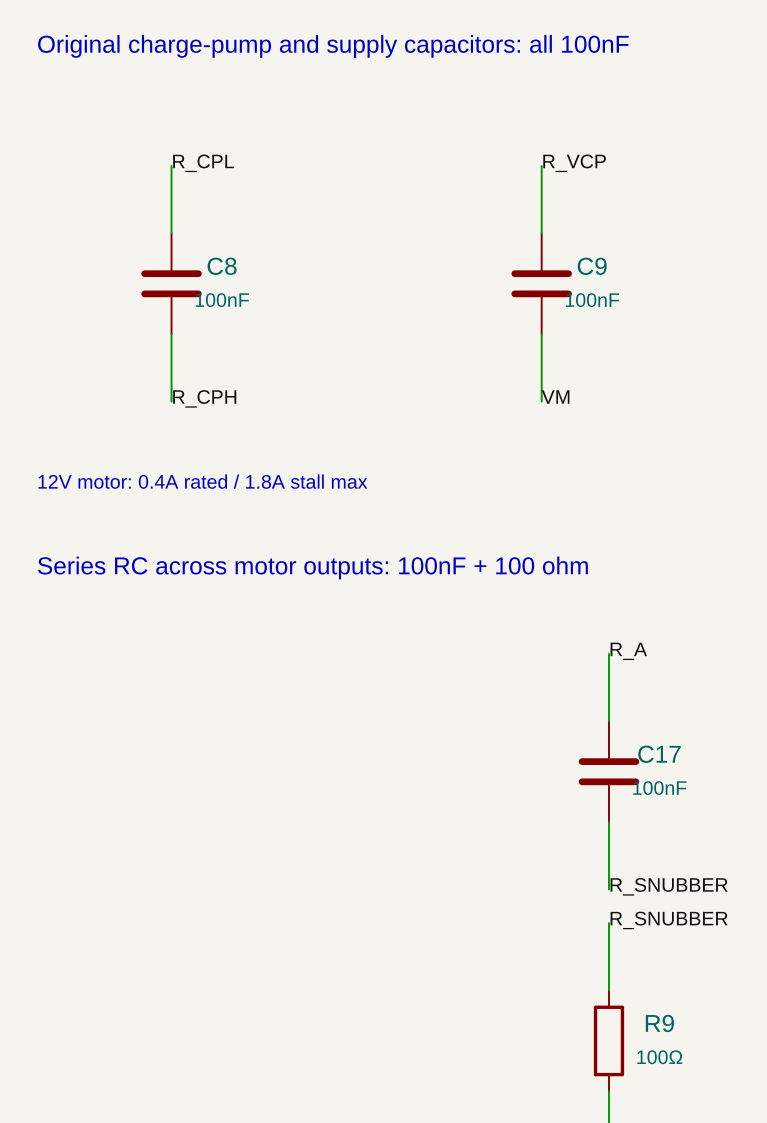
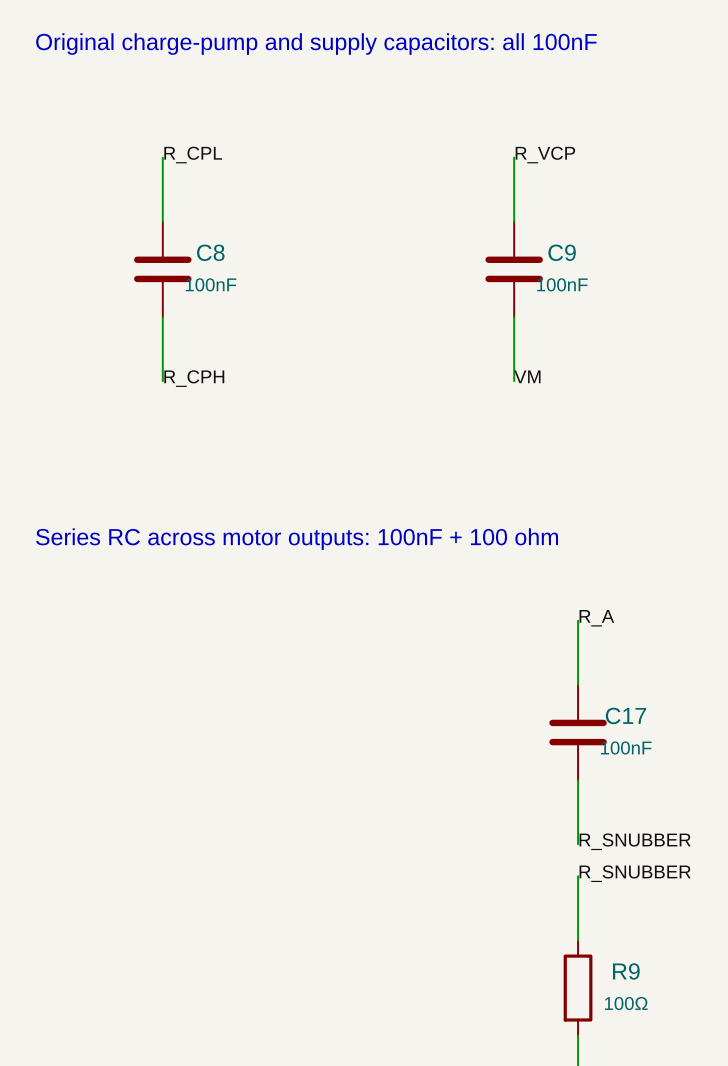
text: 12V motor: 0.4A rated / 1.8A stall max (202, 481) -> none

